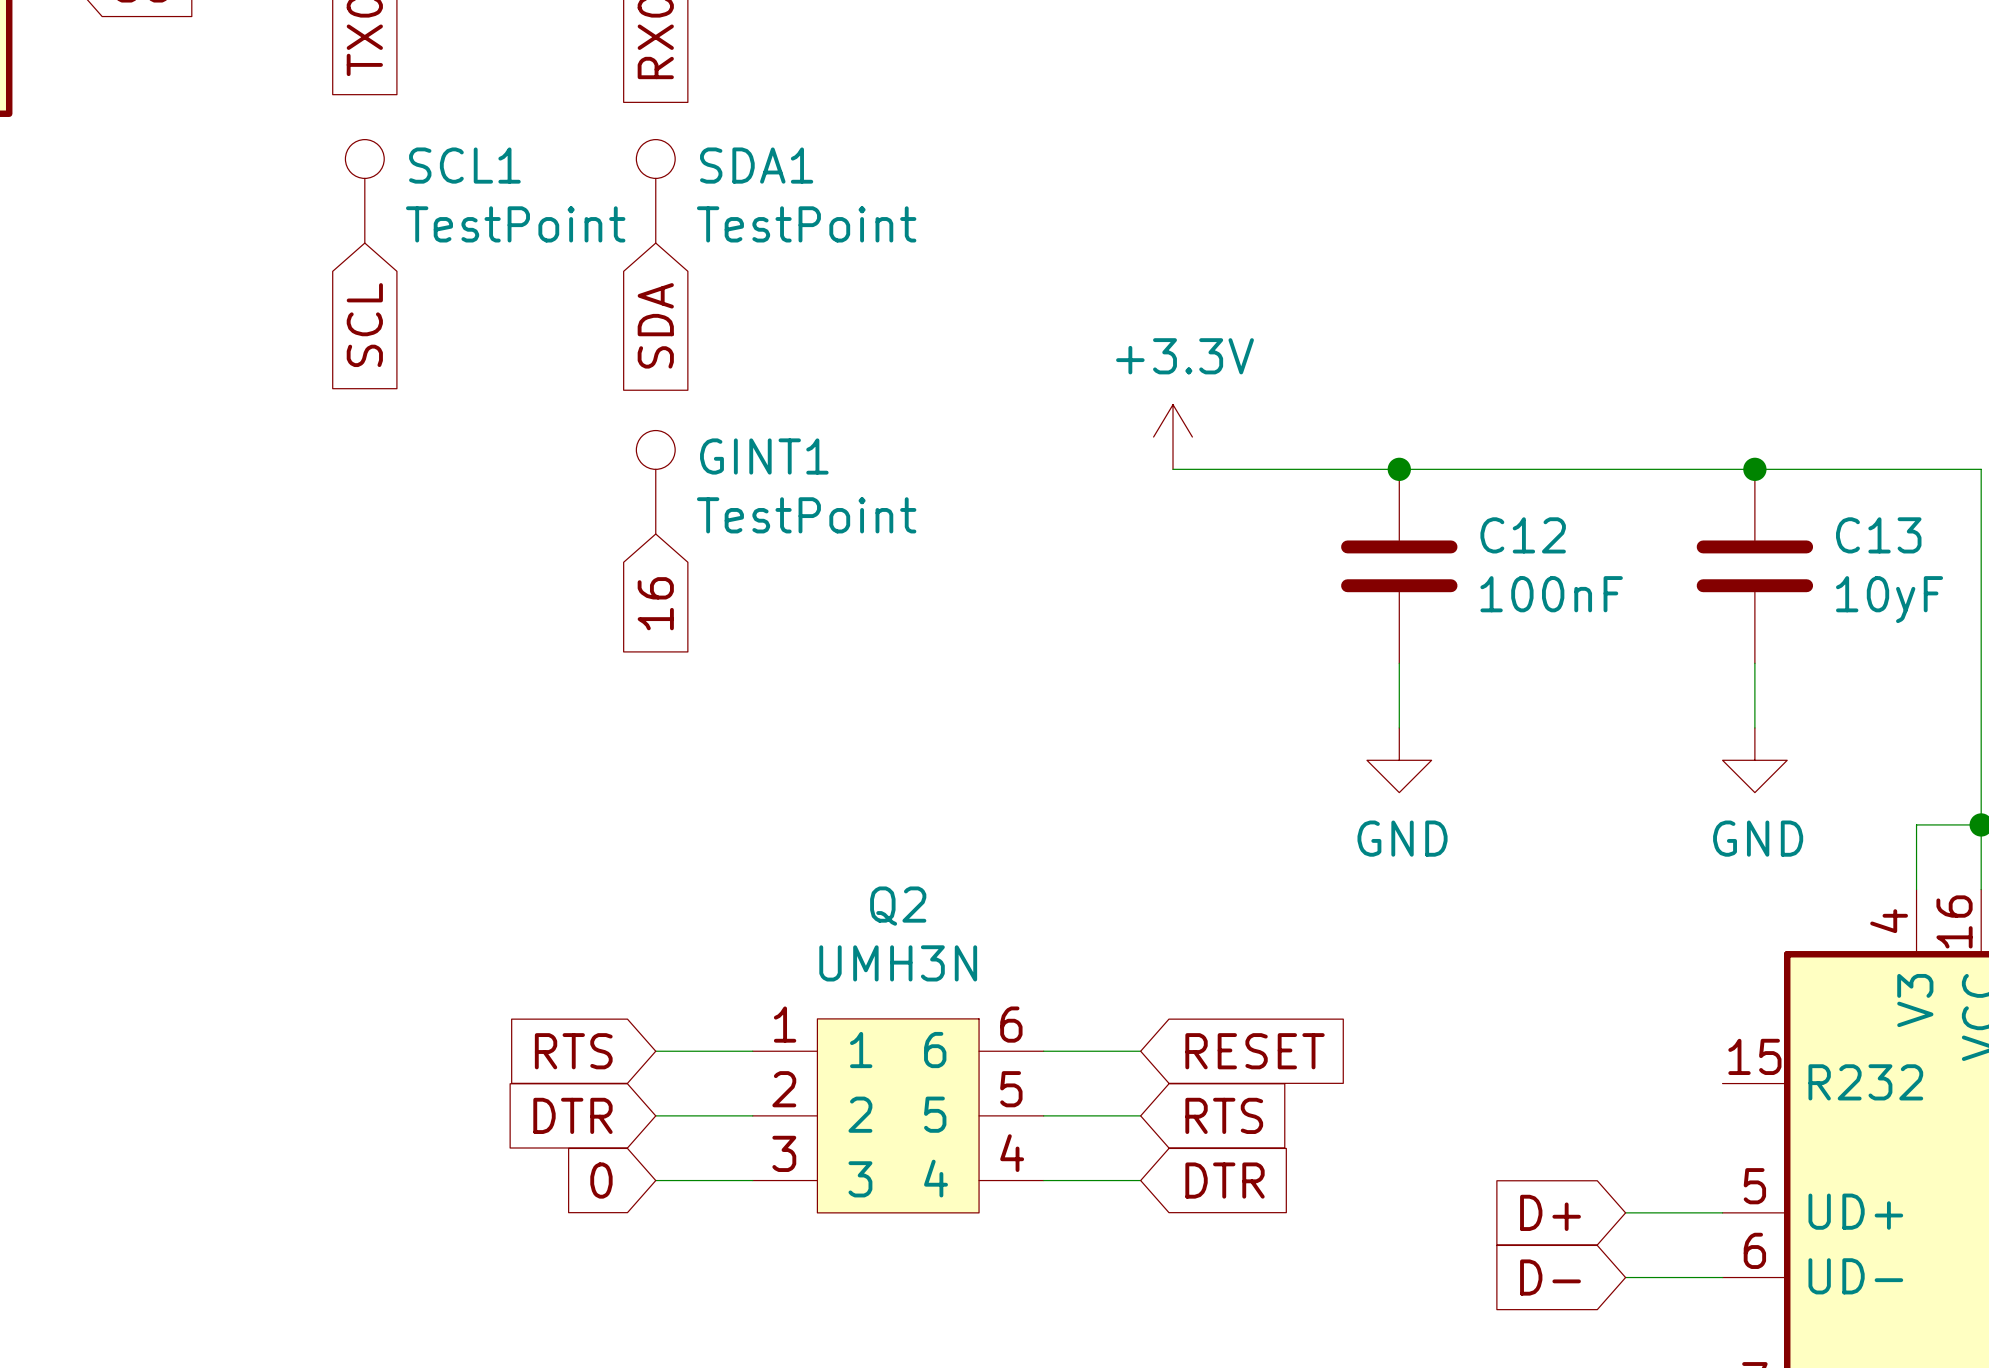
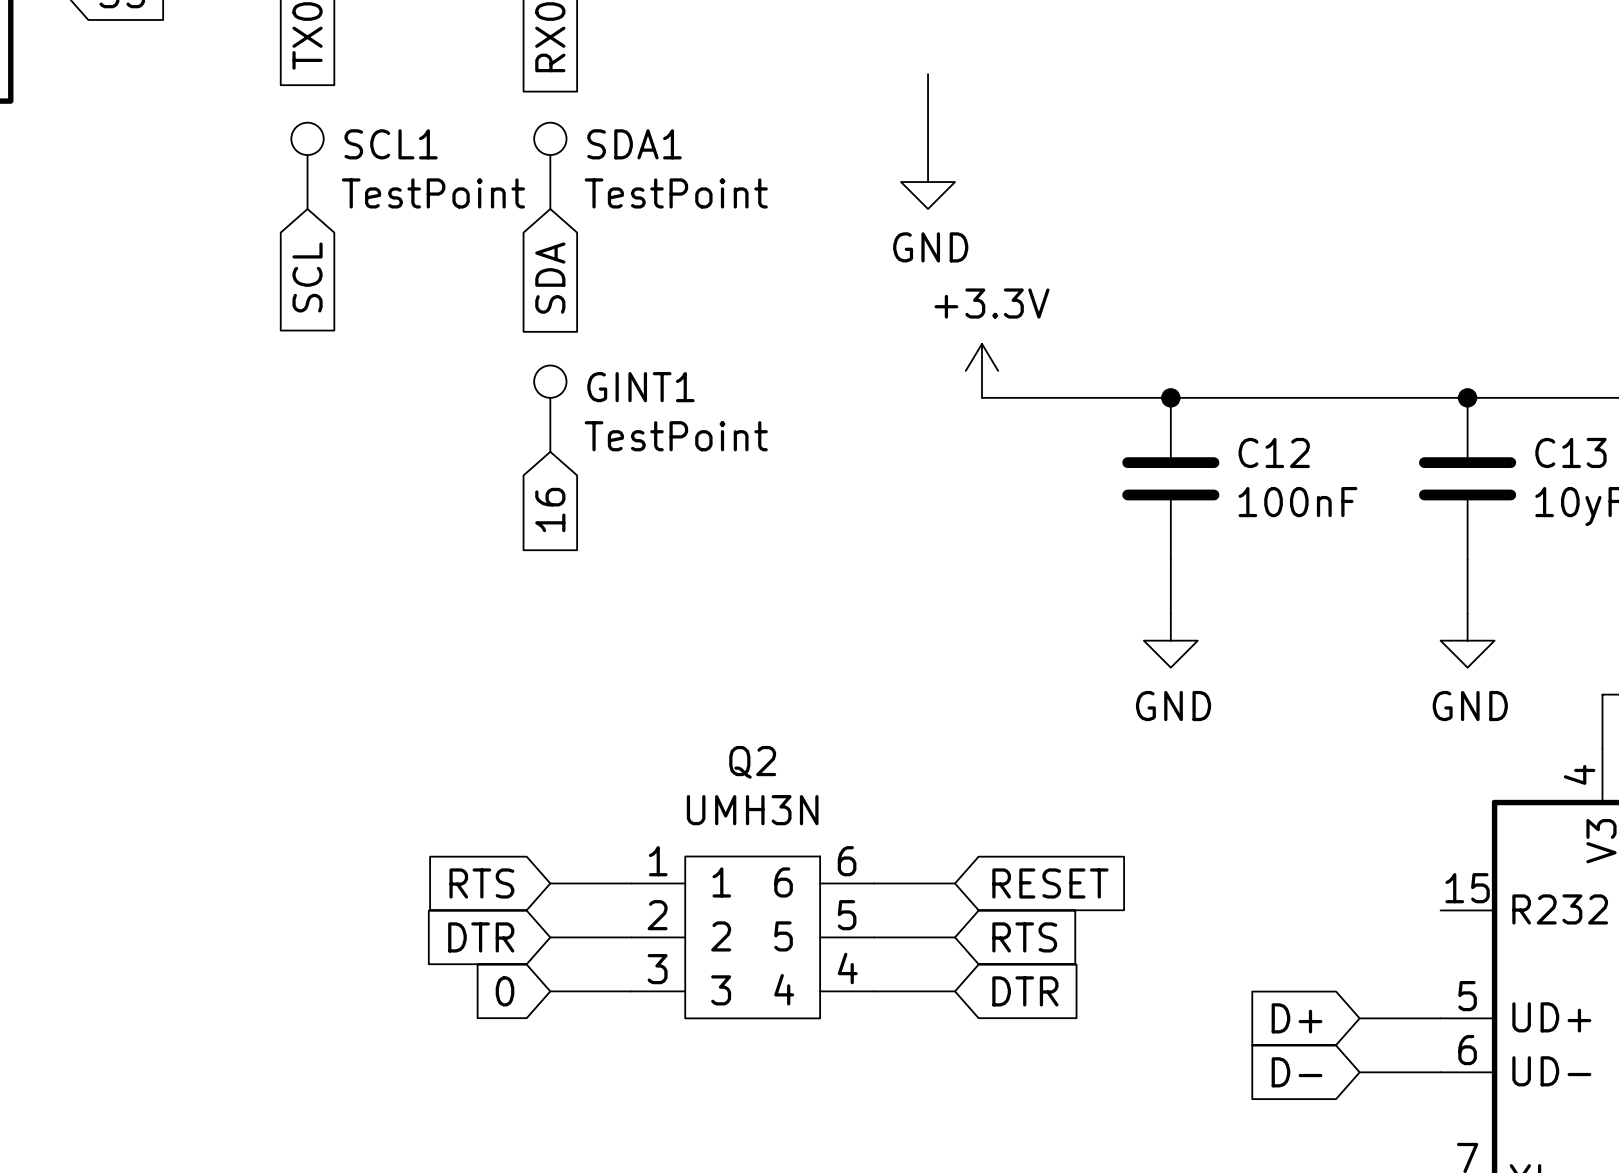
wire: none -> (928, 74) (928, 155)
power symbol: none -> GND (928, 182)

